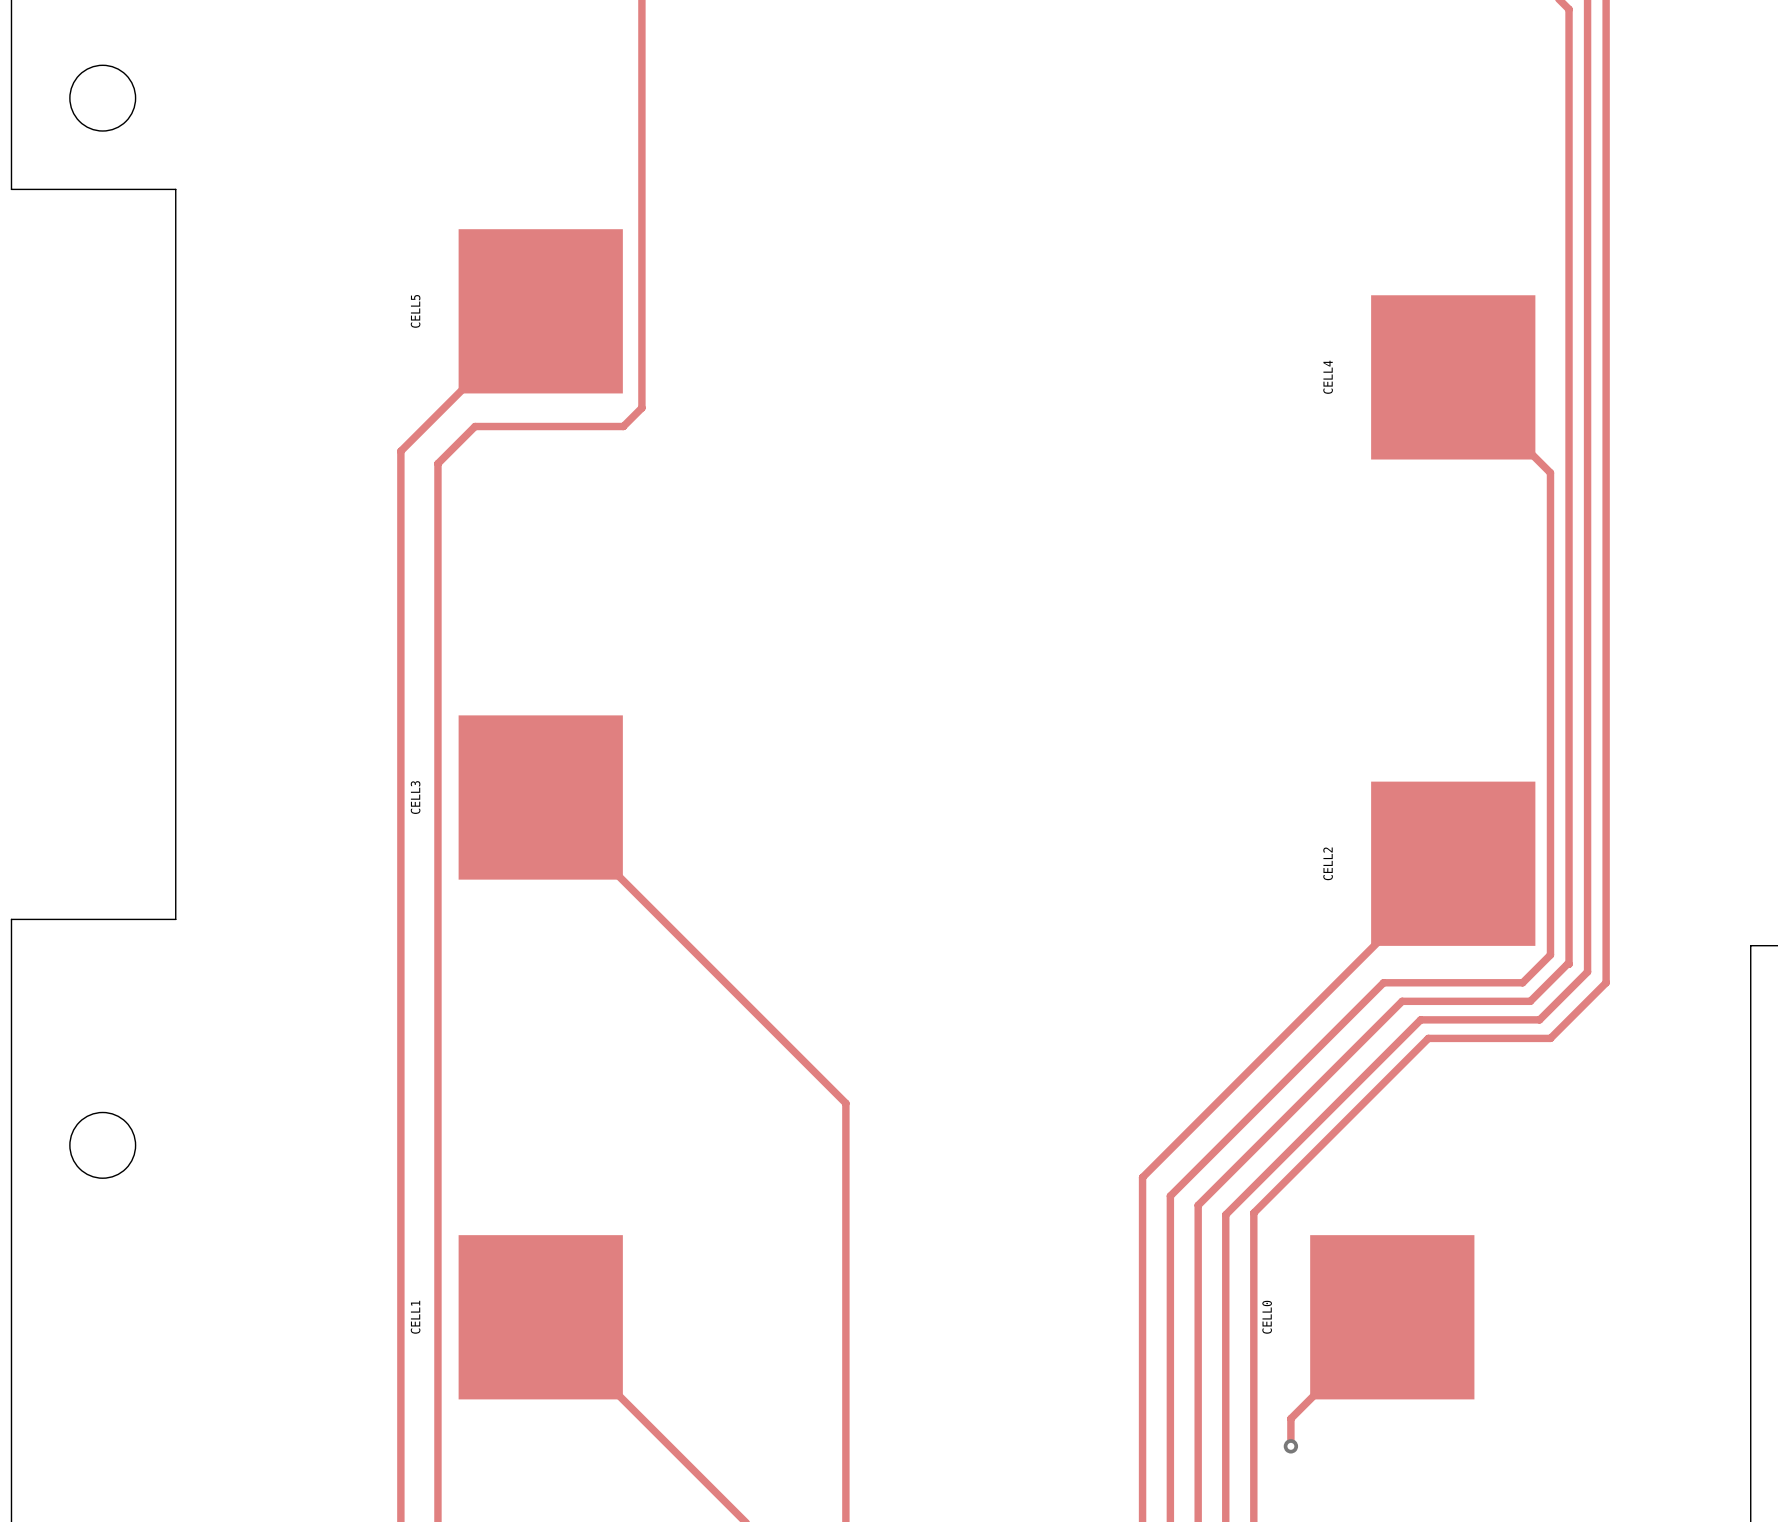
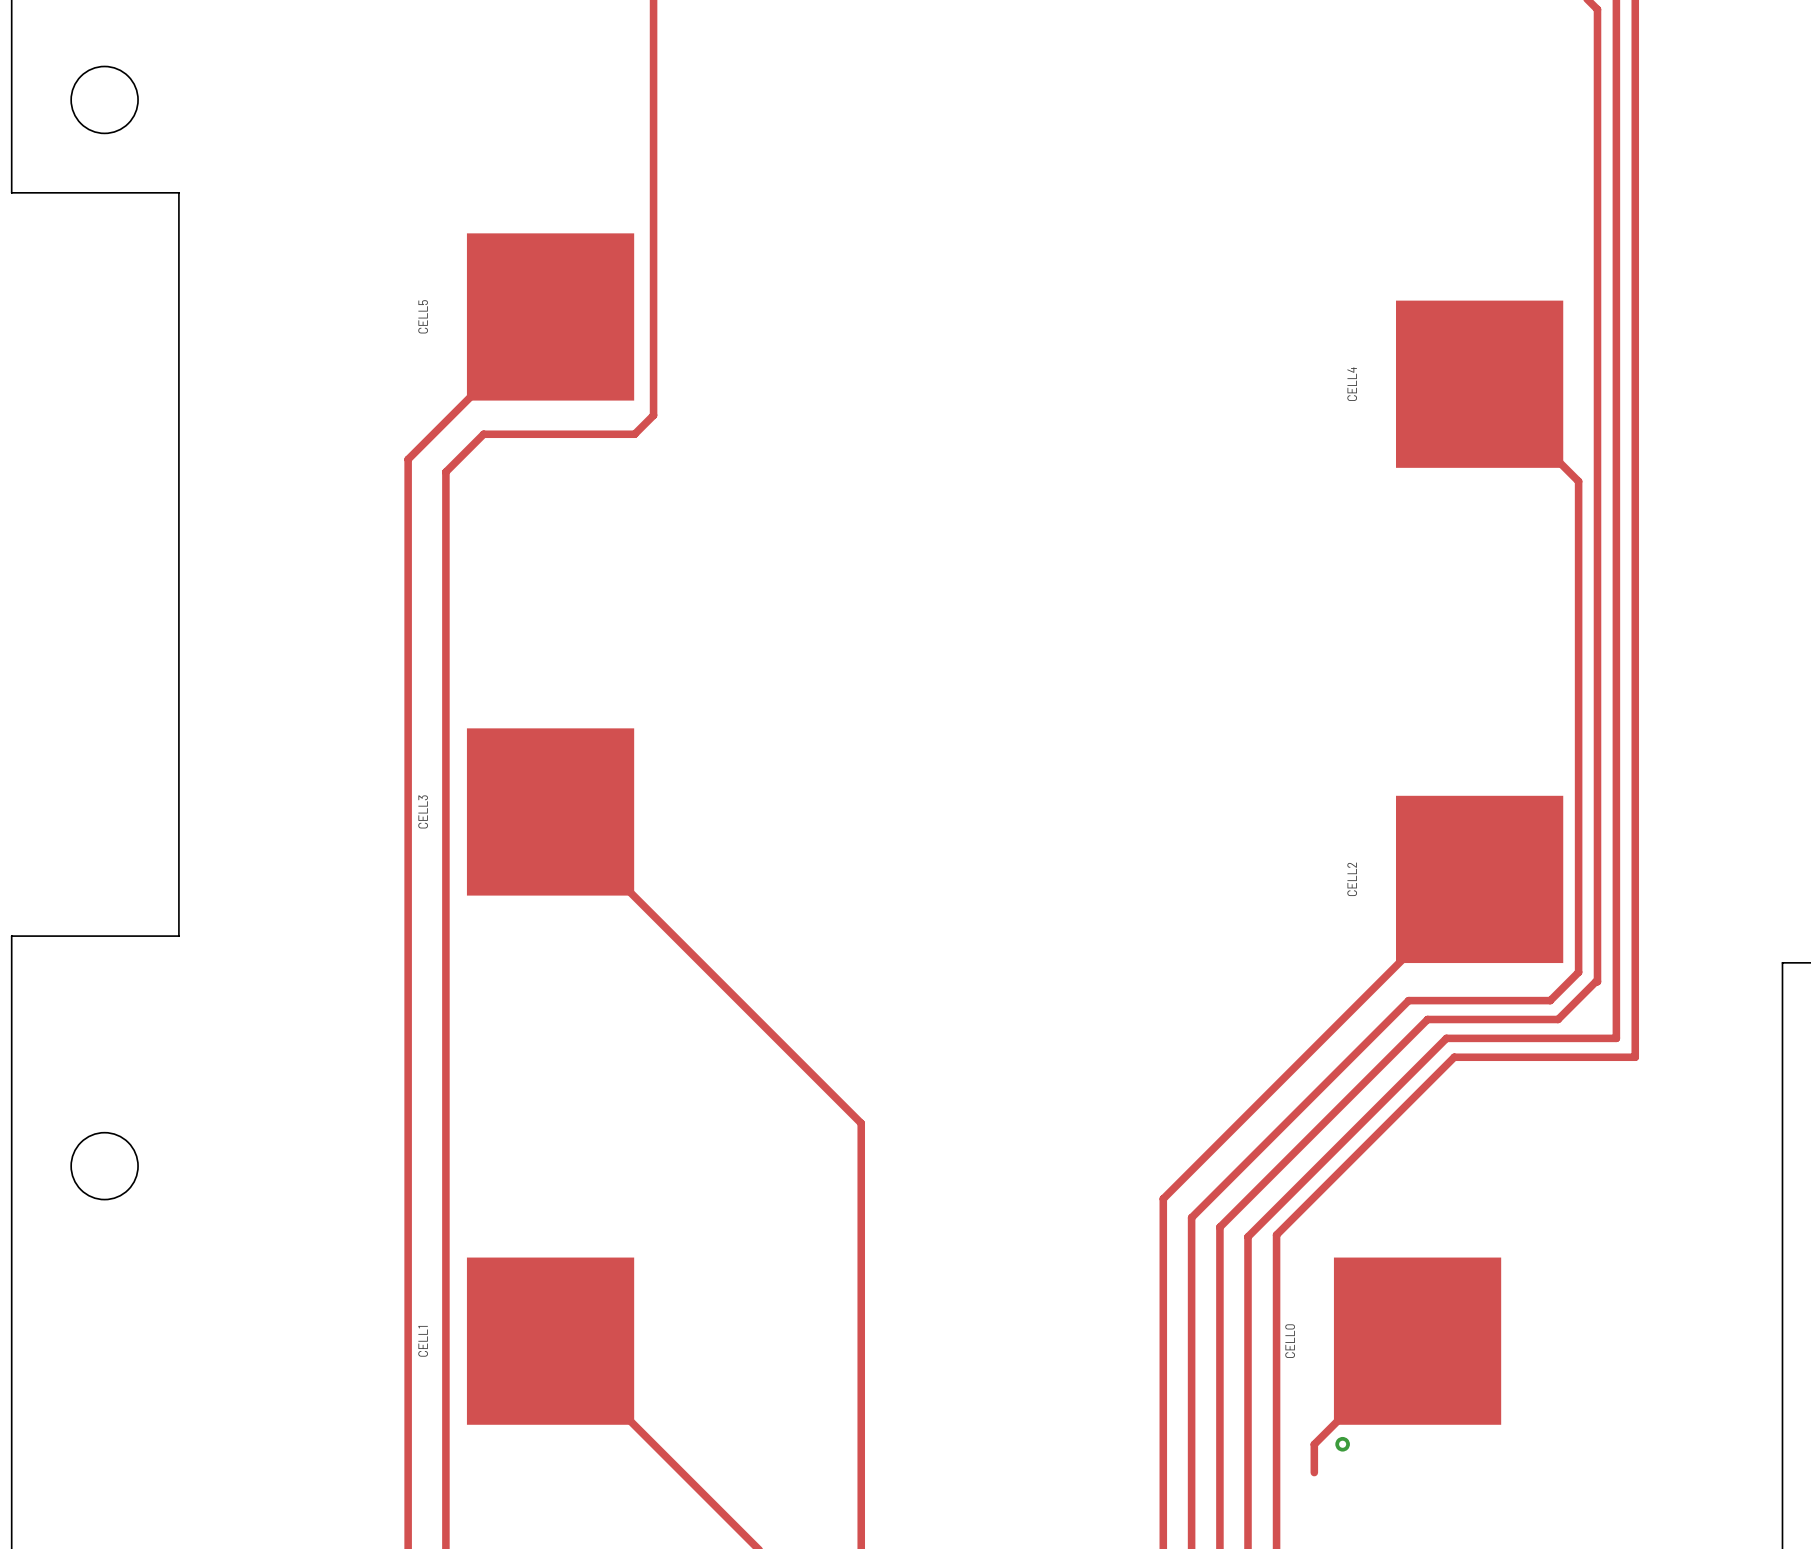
track: (1587, 971) (1539, 1019) -> (1616, 989) (1616, 1038) (1567, 1038)
track: (1606, 982) (1550, 1038) -> (1635, 1000) (1635, 1057) (1578, 1057)
via position: (1290, 1446) -> (1342, 1444)

